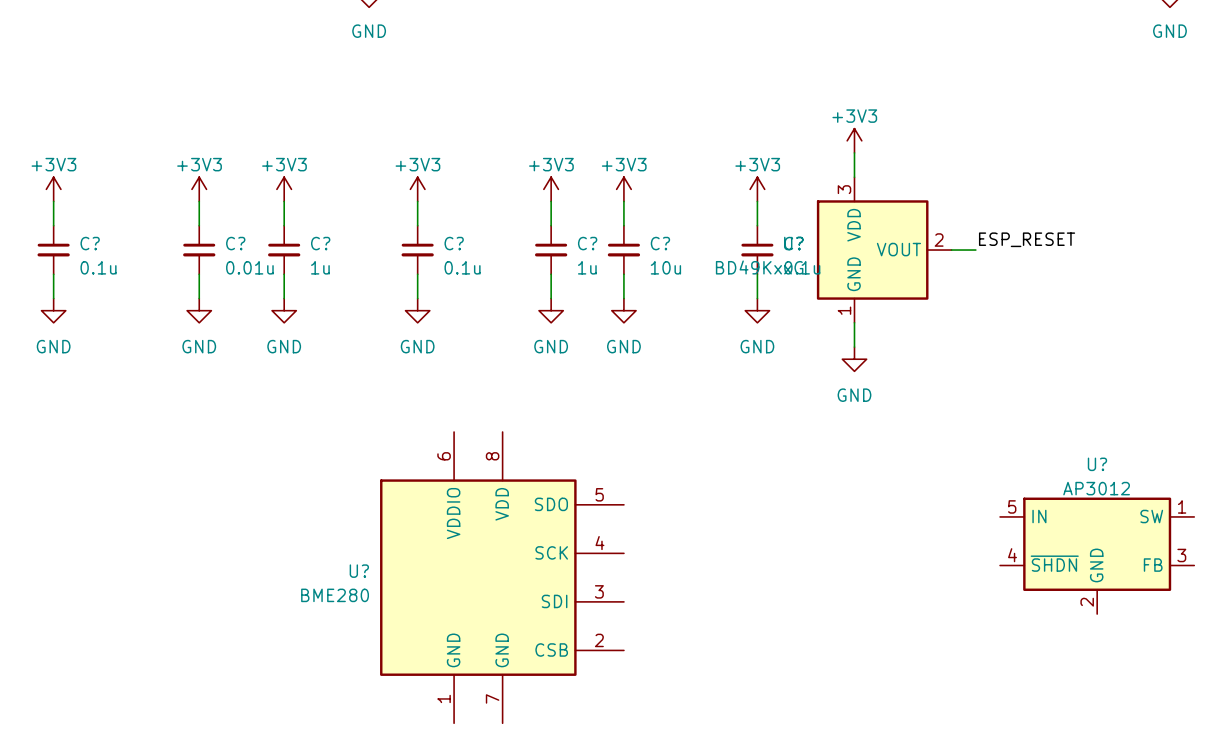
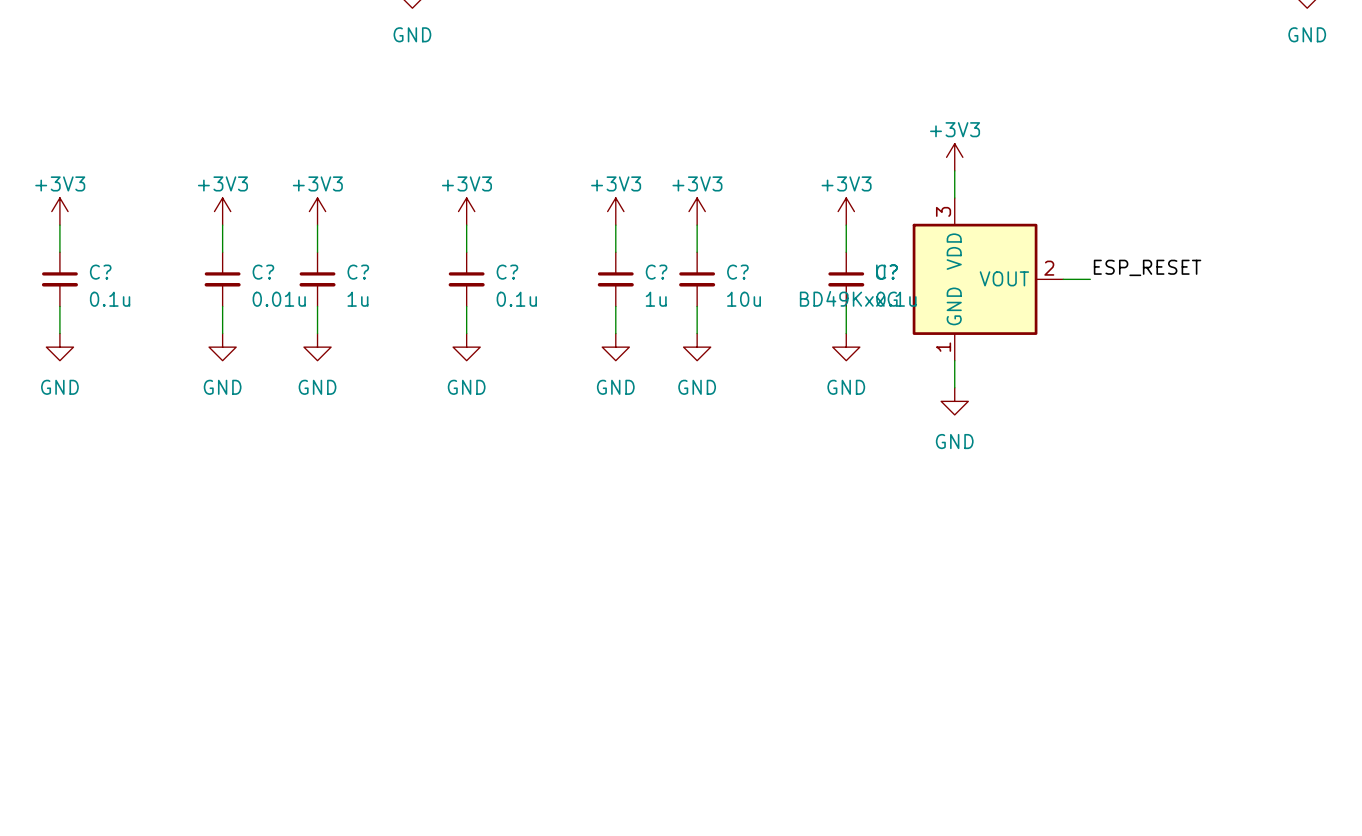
U?: AP3012 (1097, 555) -> none
U?: BME280 (501, 577) -> none

